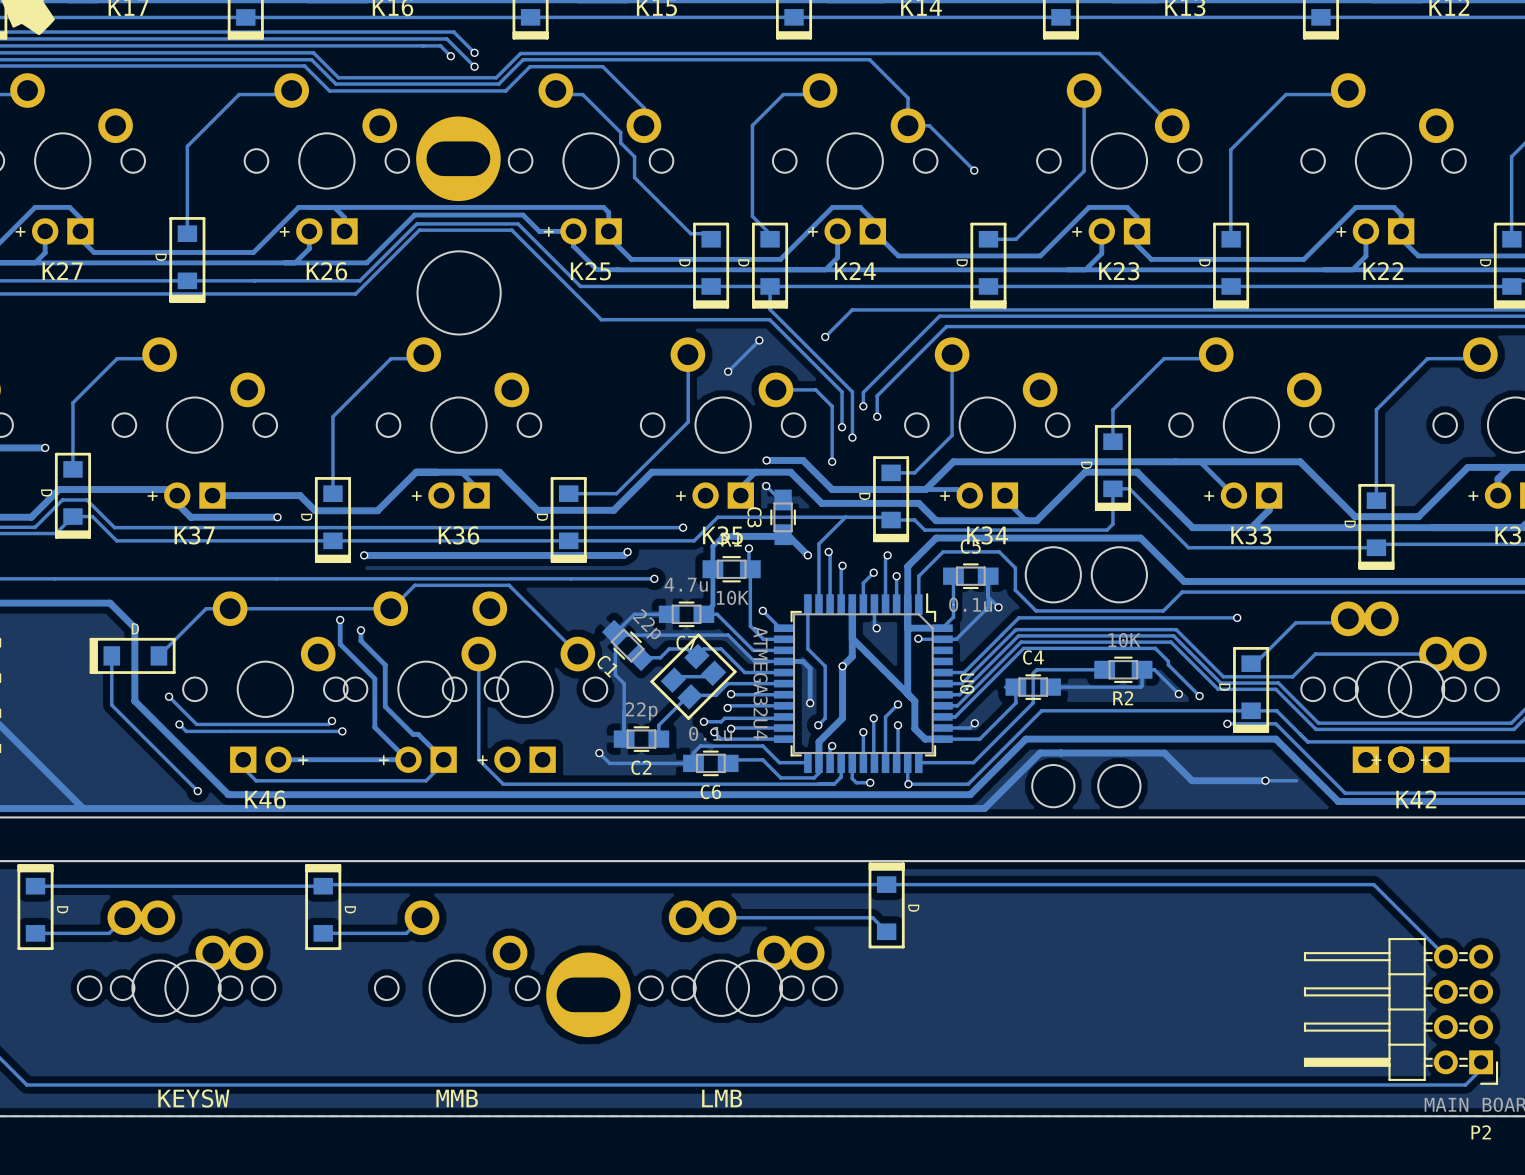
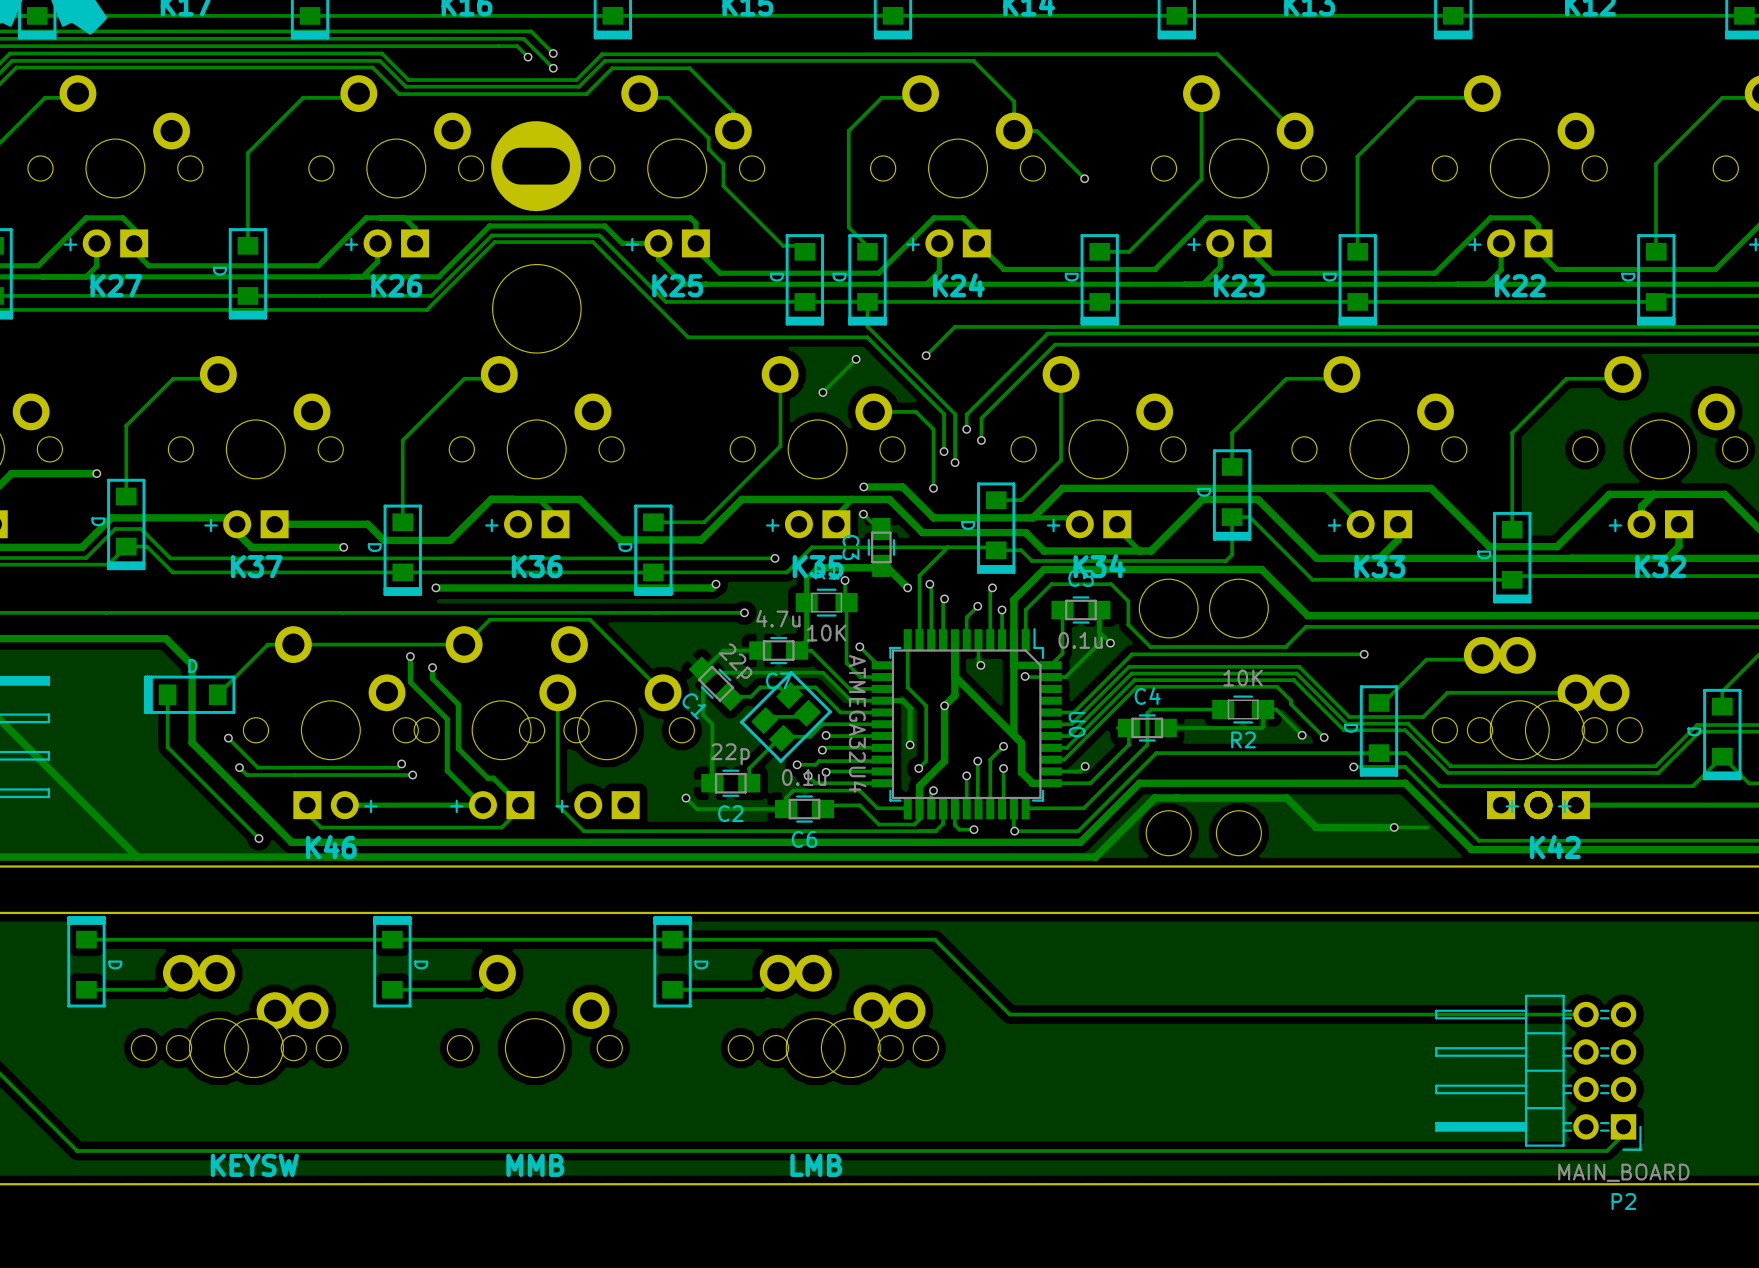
track: (323, 886) (324, 884) (1373, 884) (1445, 956) -> (392, 939) (934, 939) (1009, 1014) (1586, 1014)
part position: (886, 905) -> (672, 961)
track: none -> (778, 973) (761, 989) (672, 989)
track: (719, 917) (872, 917) (886, 931) -> none
part: (588, 994) -> none

